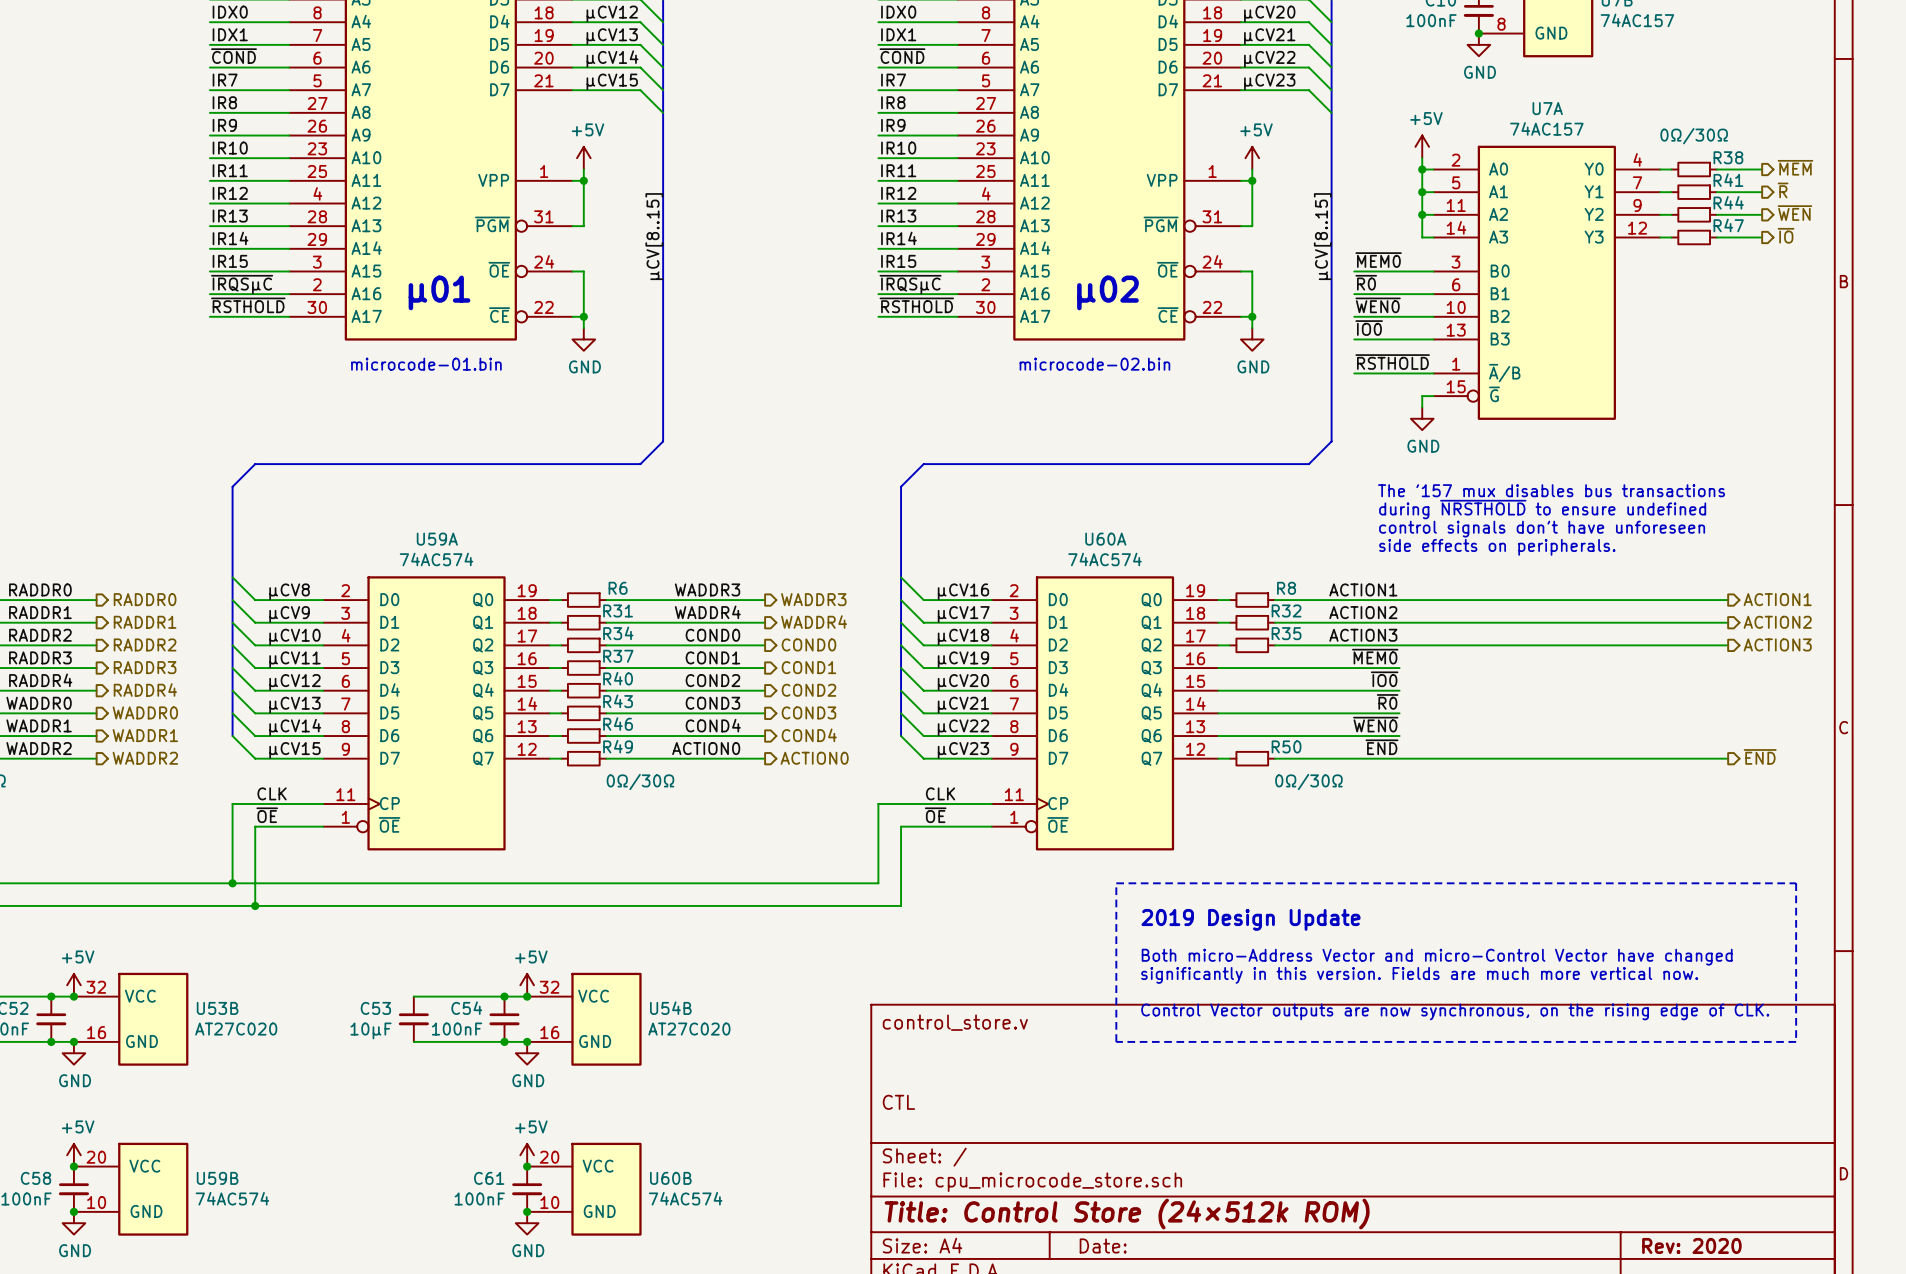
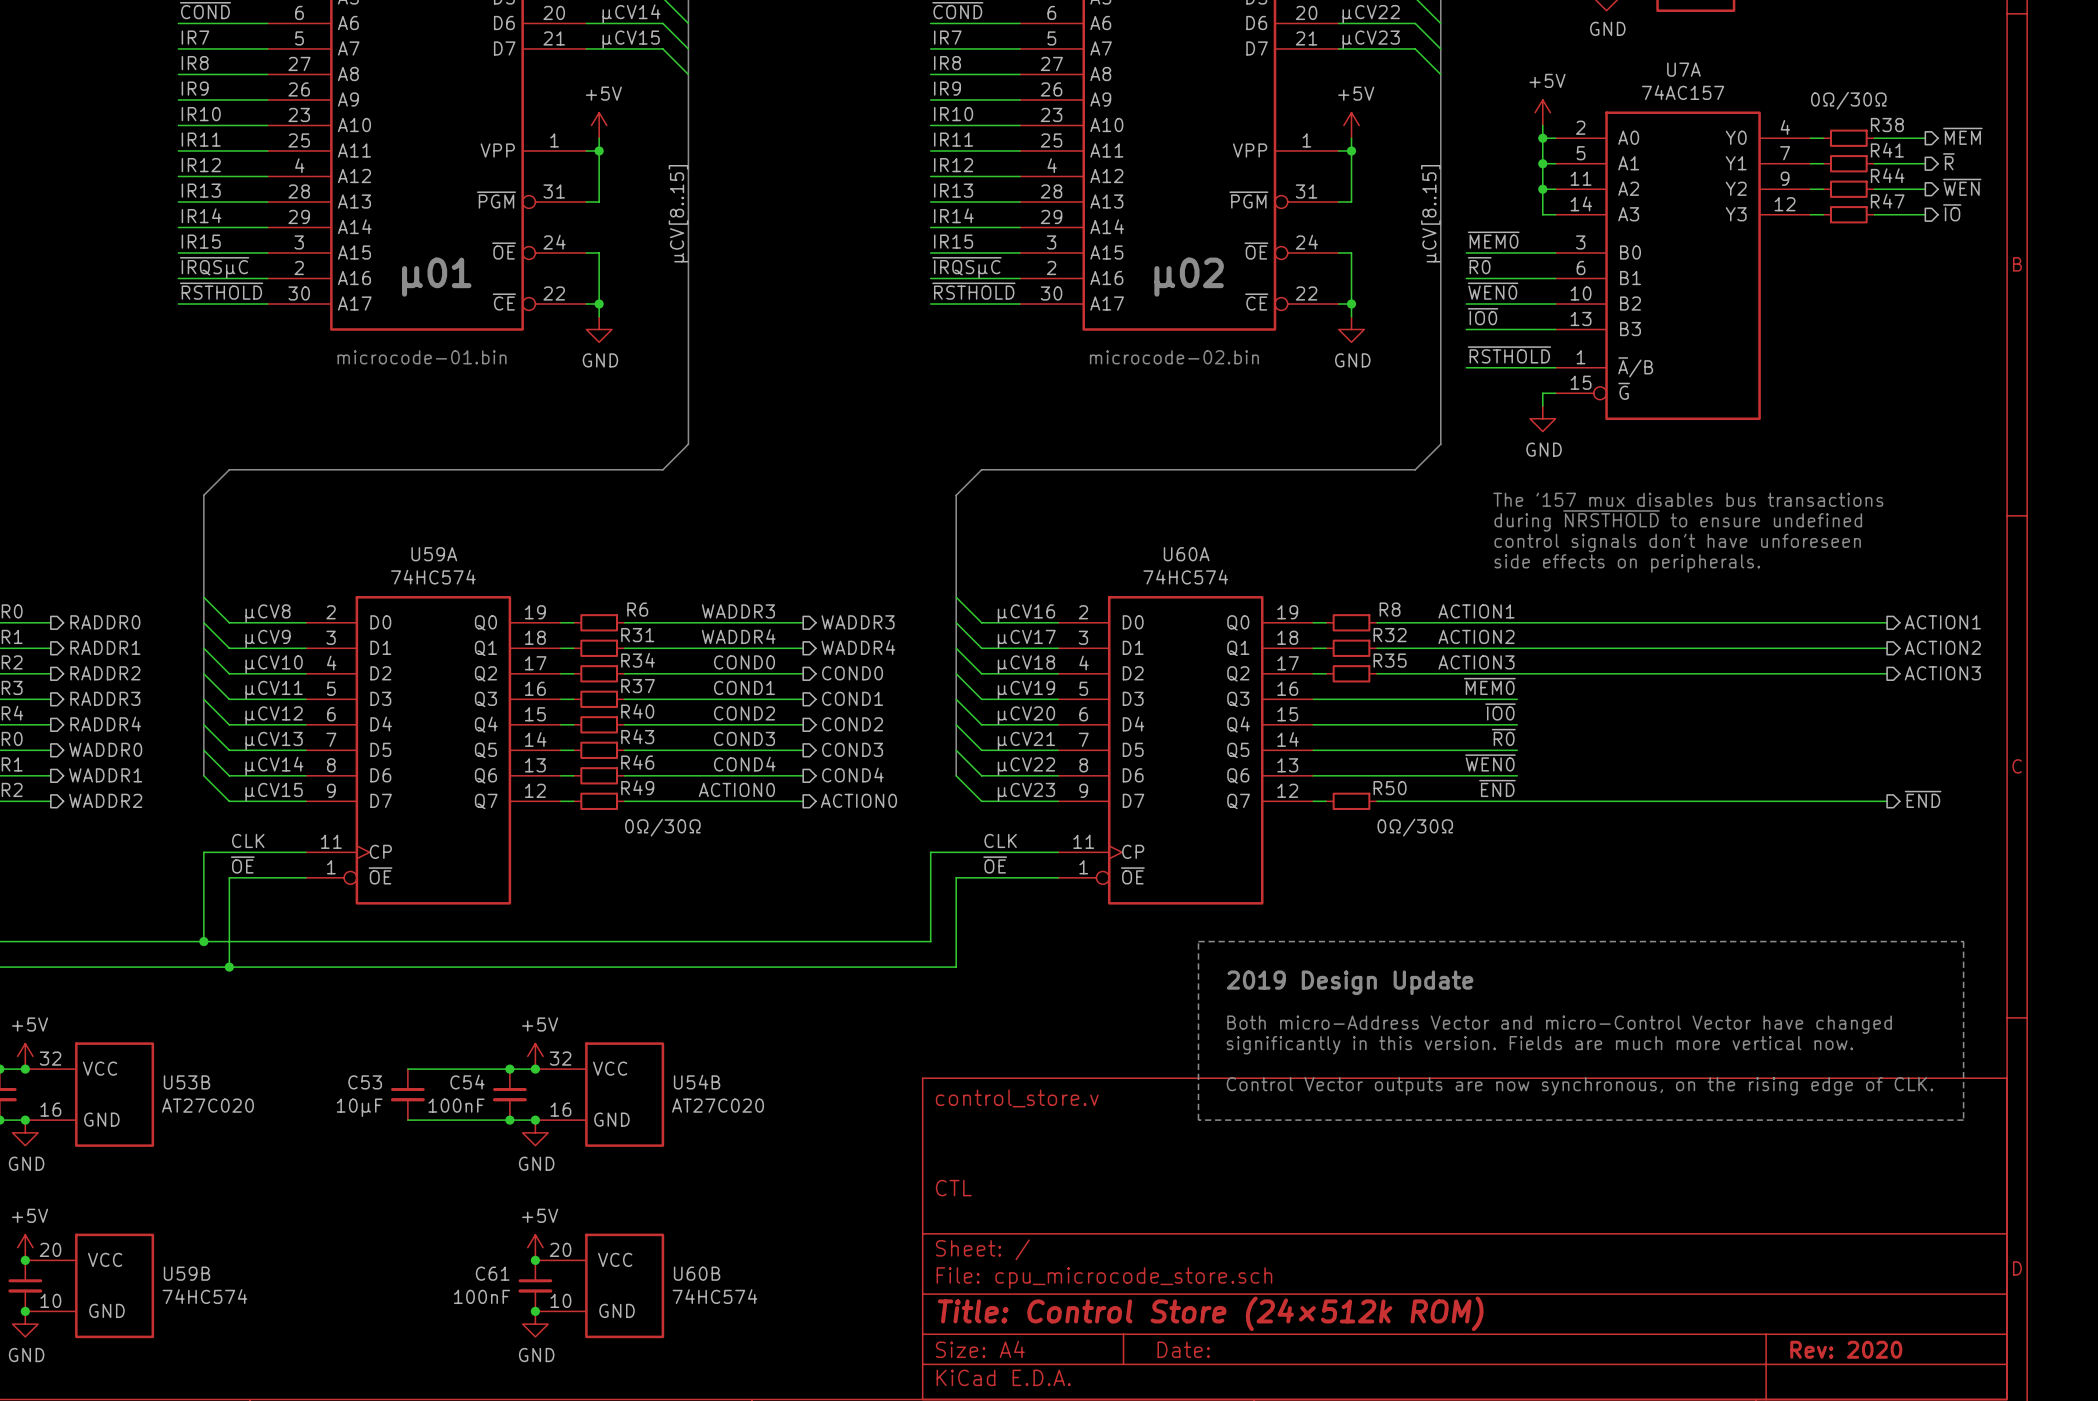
U59A value: 74AC574 (436, 559) -> 74HC574 (433, 577)
U60A value: 74AC574 (1104, 559) -> 74HC574 (1185, 577)
U59B value: 74AC574 (232, 1198) -> 74HC574 (204, 1296)
U60B value: 74AC574 (685, 1198) -> 74HC574 (714, 1296)

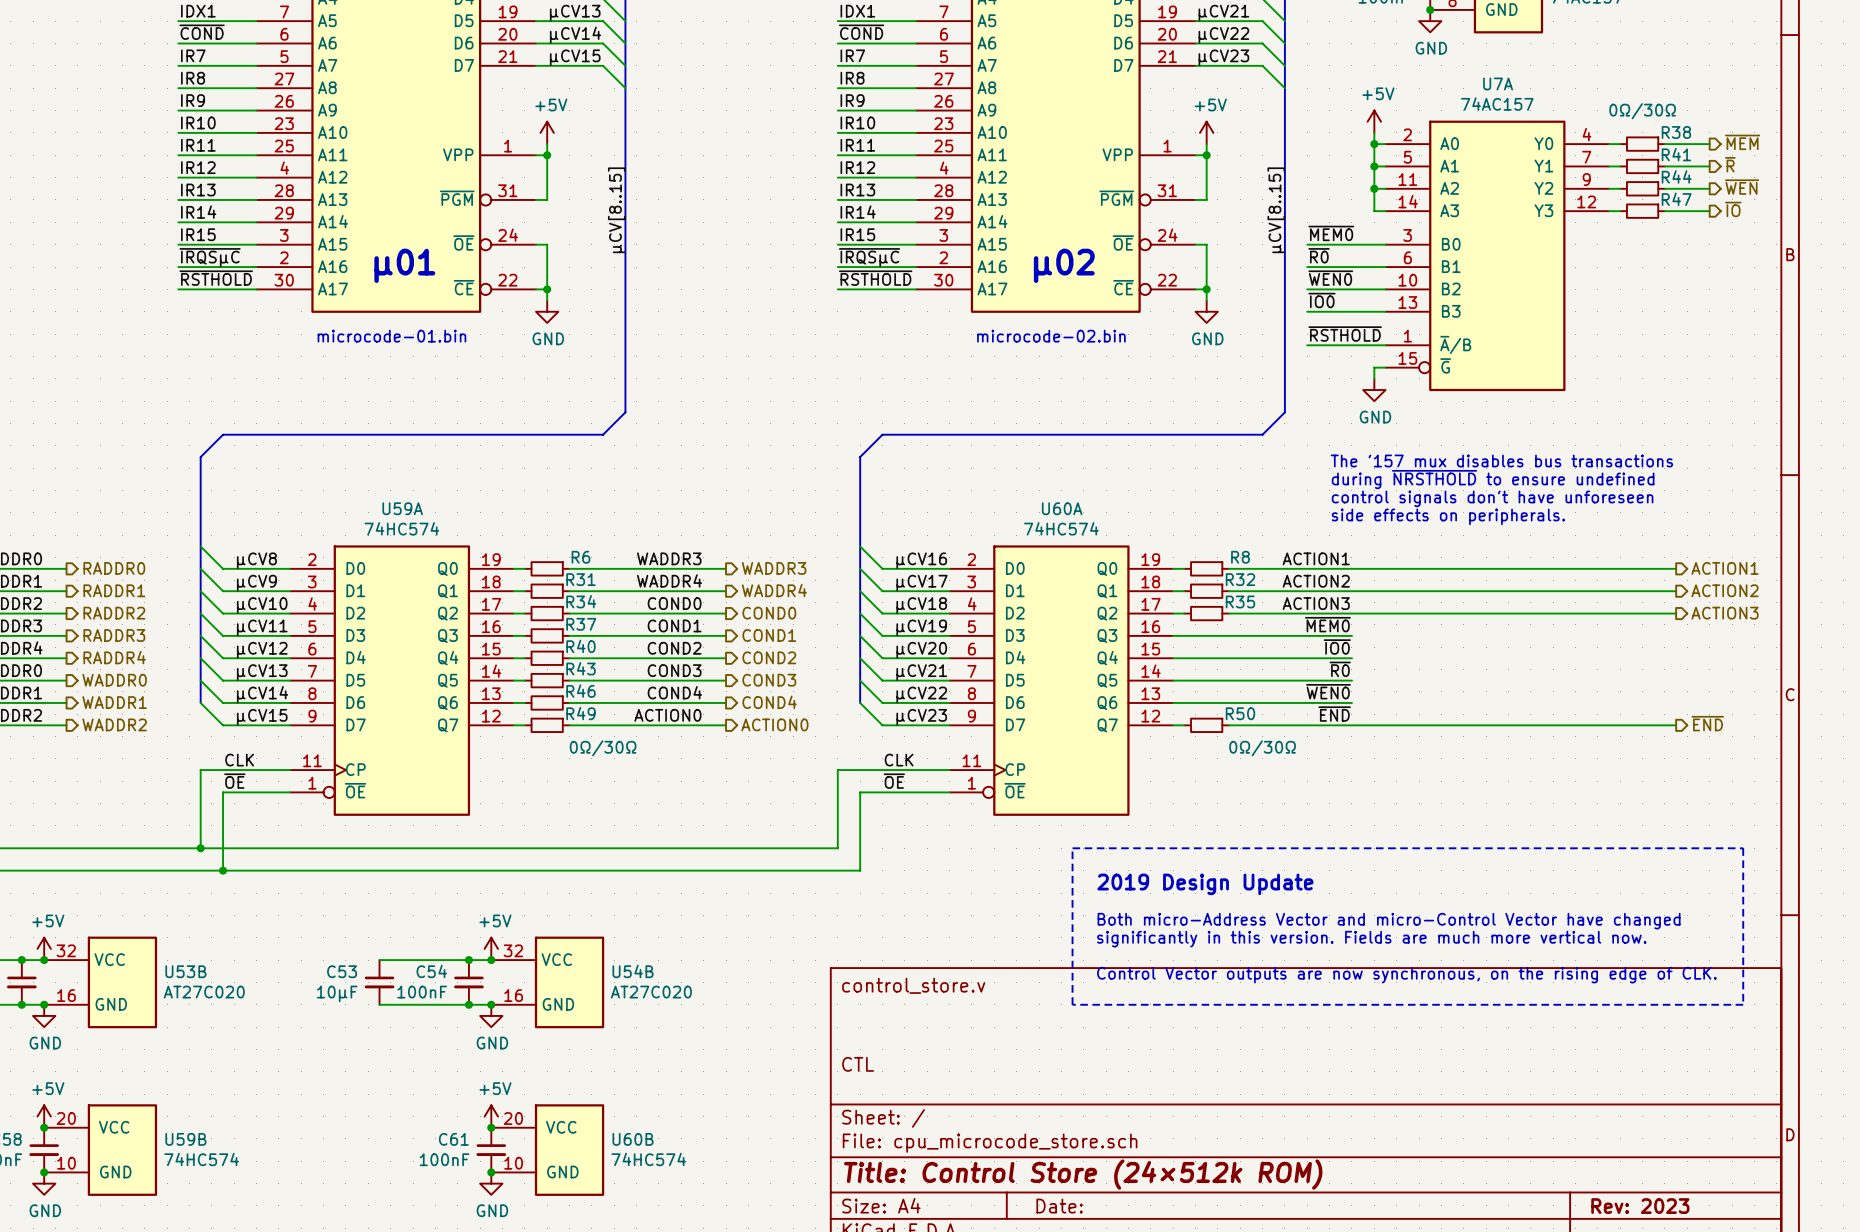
title block: Rev: 2020 (1846, 1349) -> Rev: 2023 (1640, 1206)

